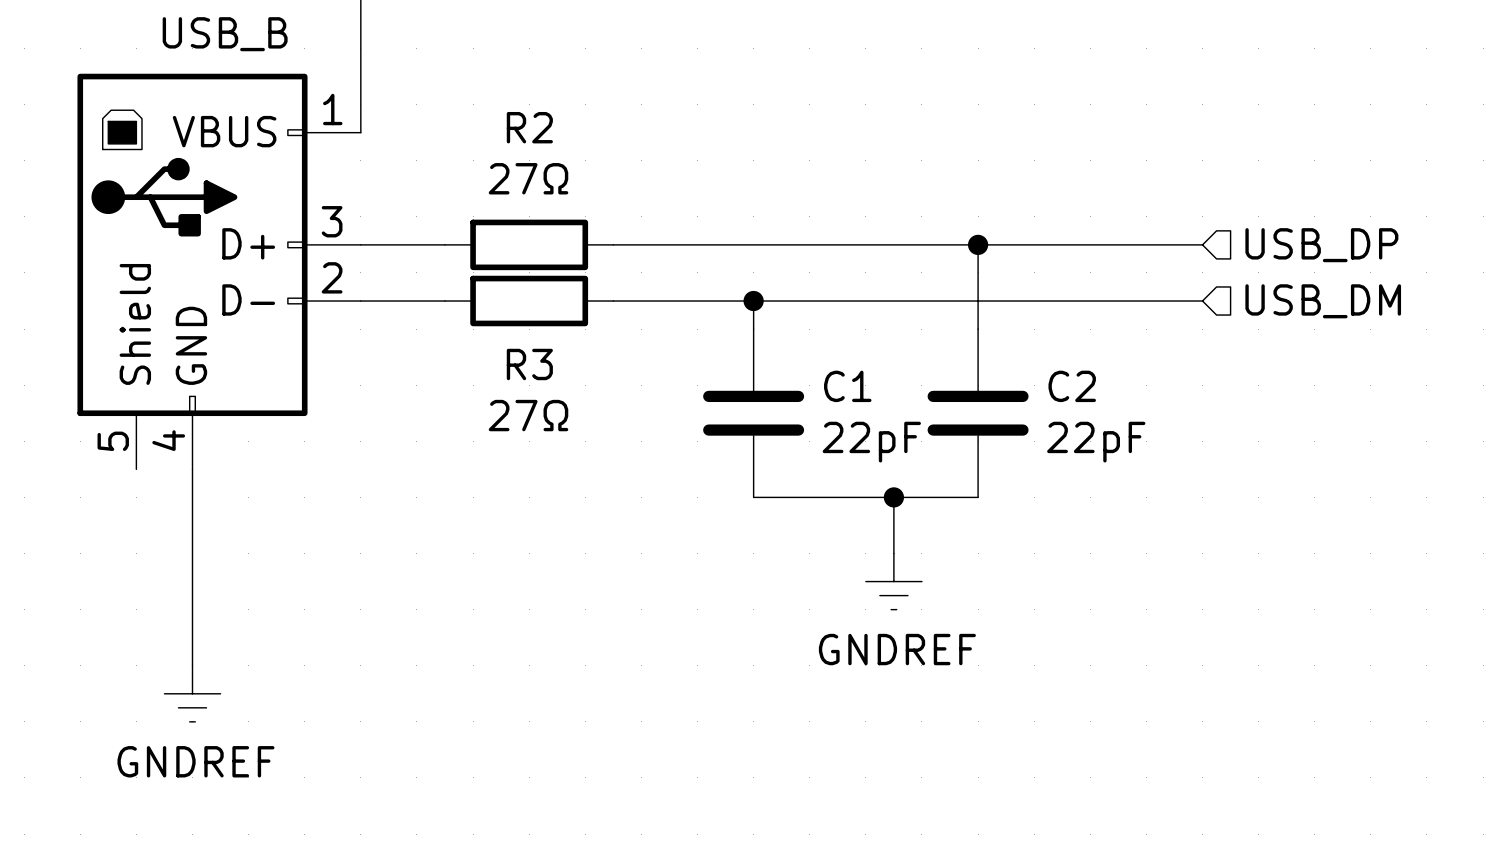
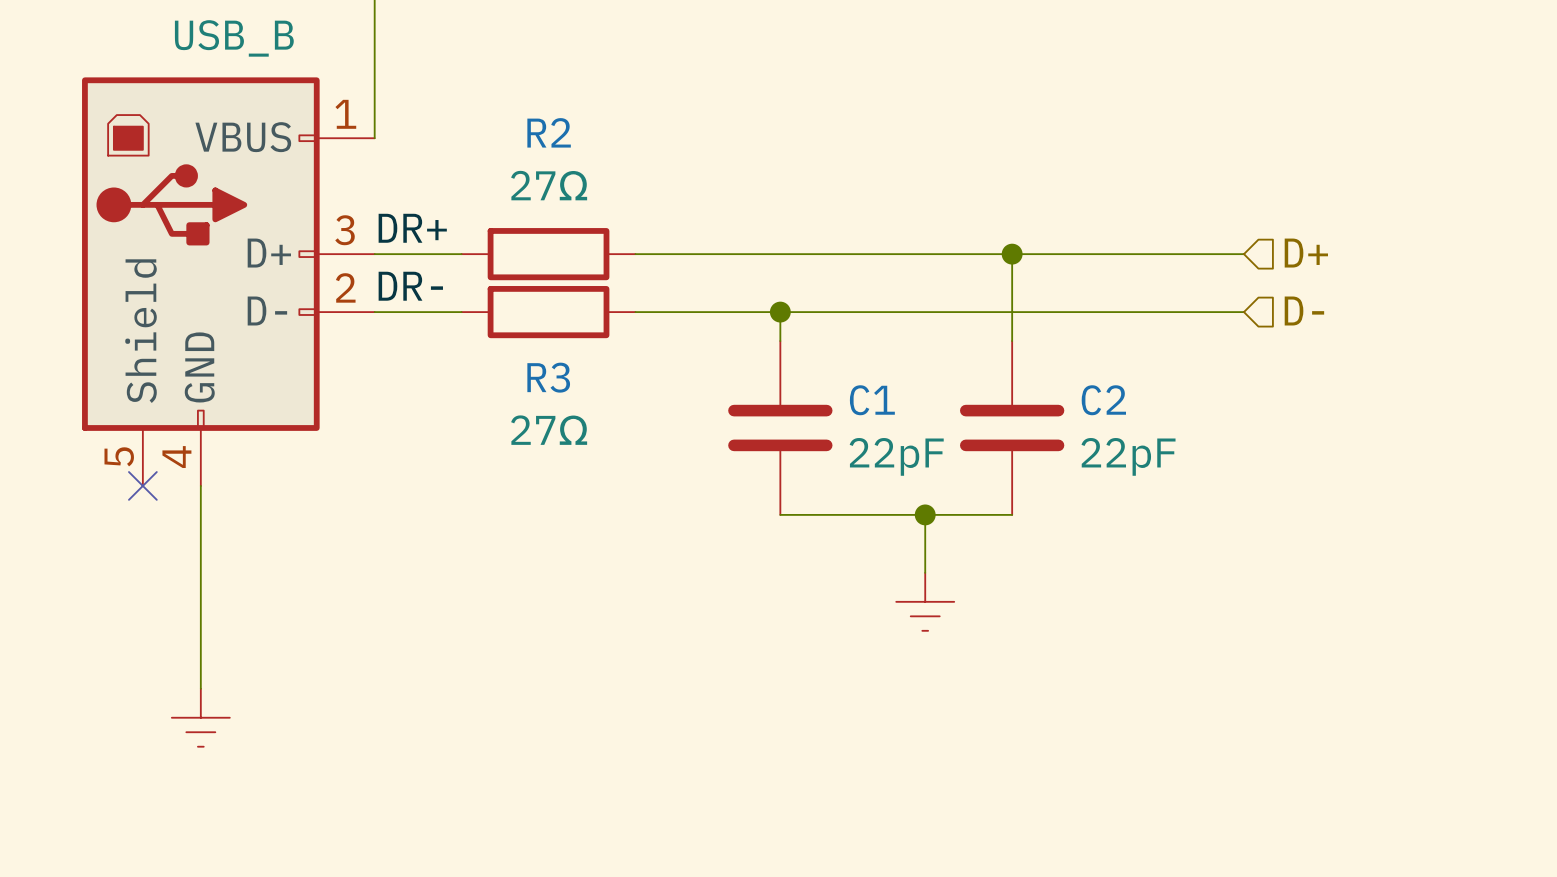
label: none -> DR+ (412, 228)
hierarchical label: USB_DP (1321, 245) -> D+ (1306, 253)
label: none -> DR- (410, 286)
hierarchical label: USB_DM (1323, 301) -> D- (1304, 311)
no-connect mark: none -> (142, 485)
power symbol text: GNDREF (897, 649) -> none
power symbol text: GNDREF (195, 761) -> none

